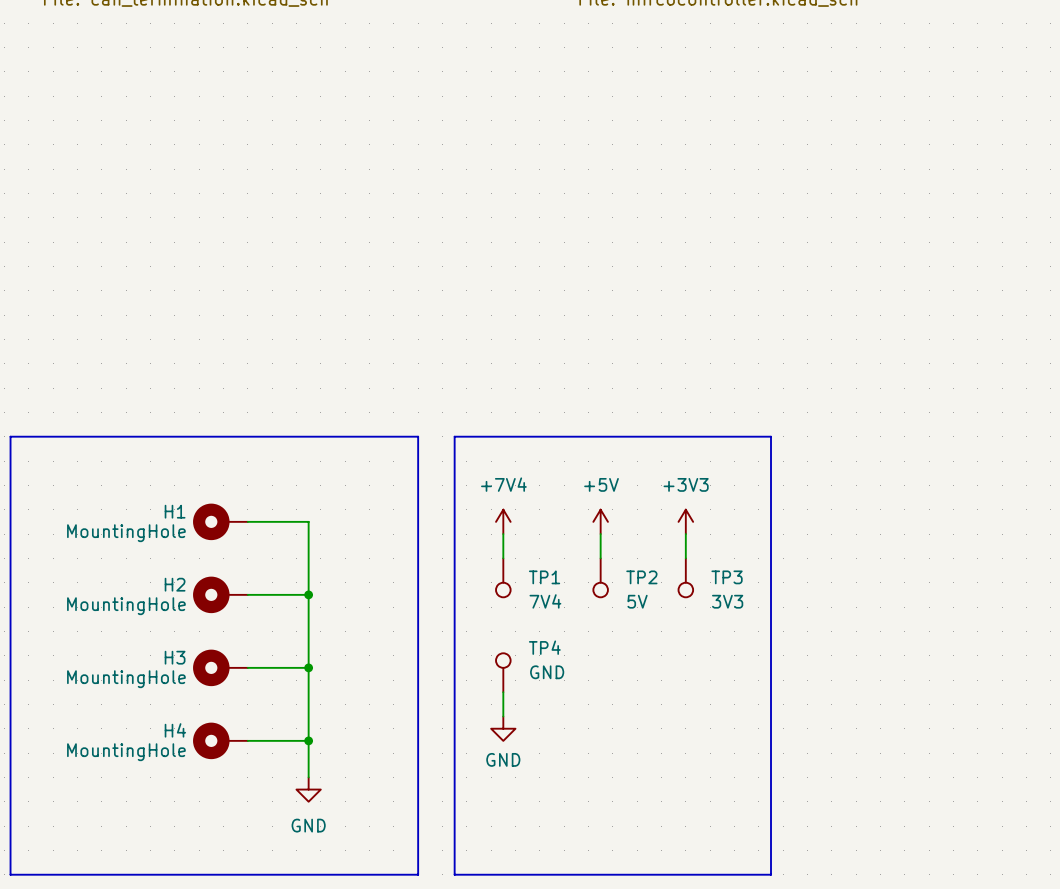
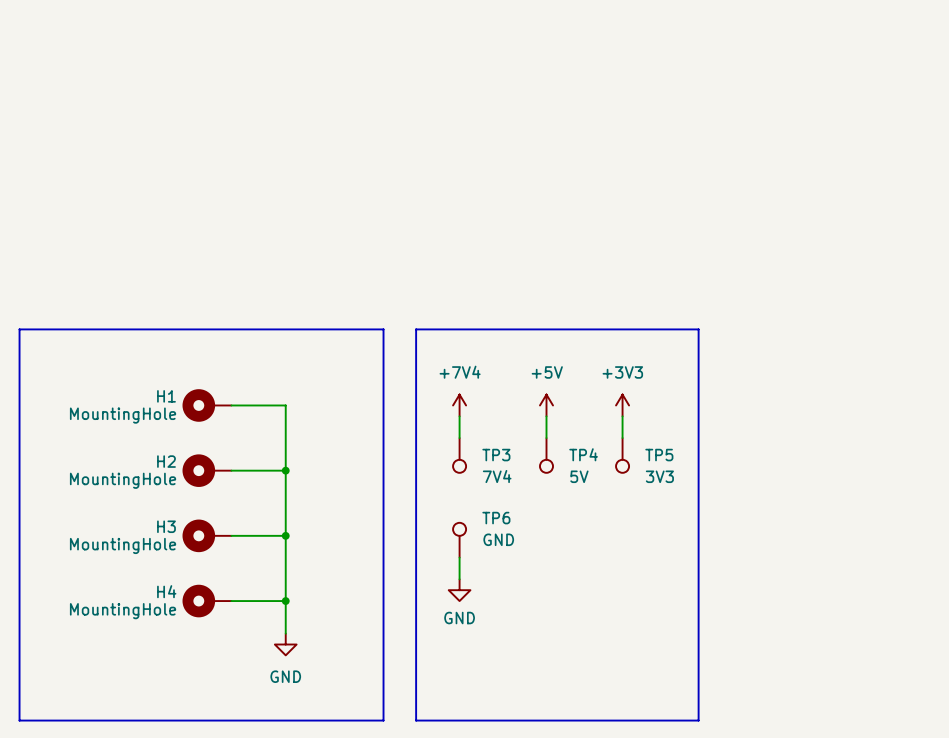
TP1 name: TP1 (544, 577) -> TP3 (496, 455)
TP2 name: TP2 (641, 577) -> TP4 (583, 454)
TP3 name: TP3 (727, 577) -> TP5 (659, 455)
TP4 name: TP4 (544, 647) -> TP6 (496, 518)

